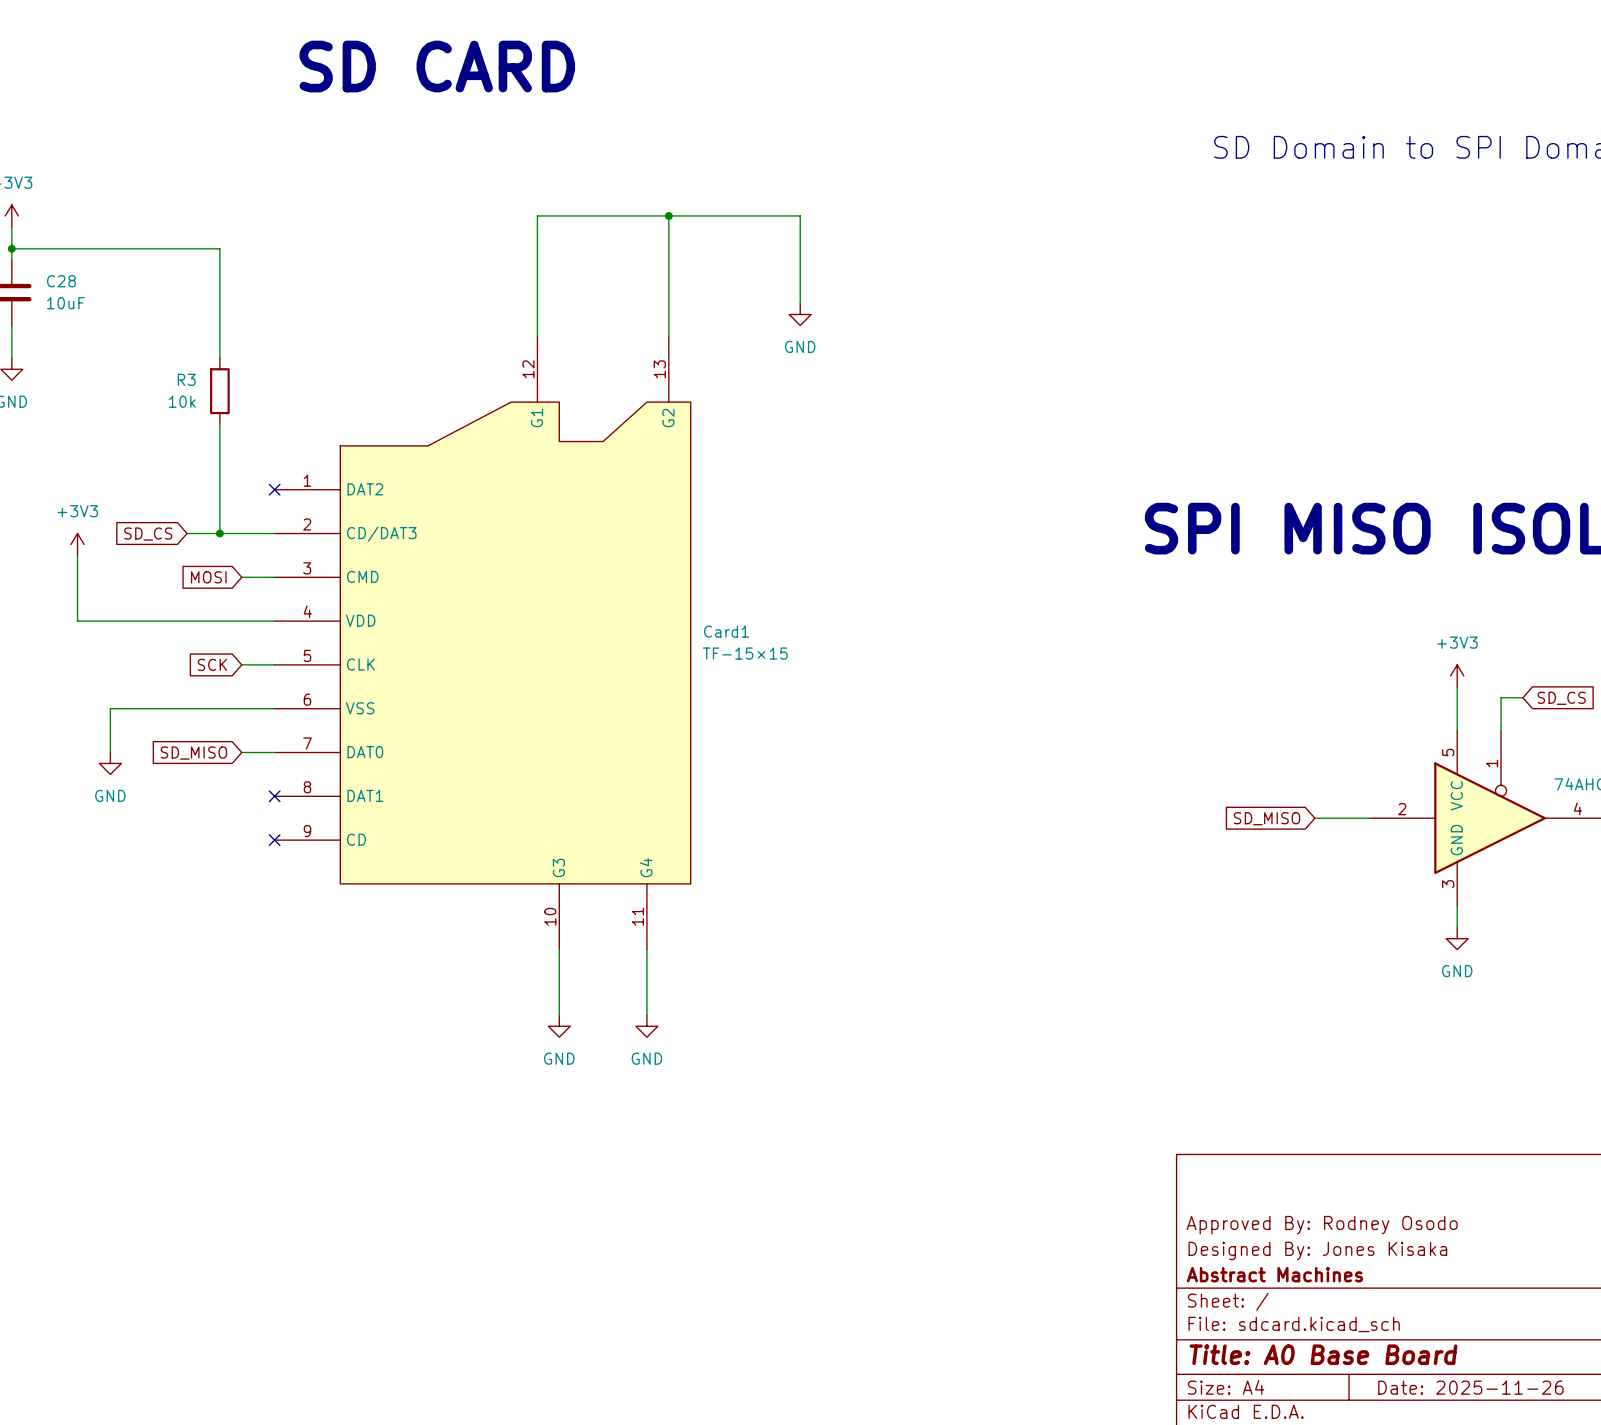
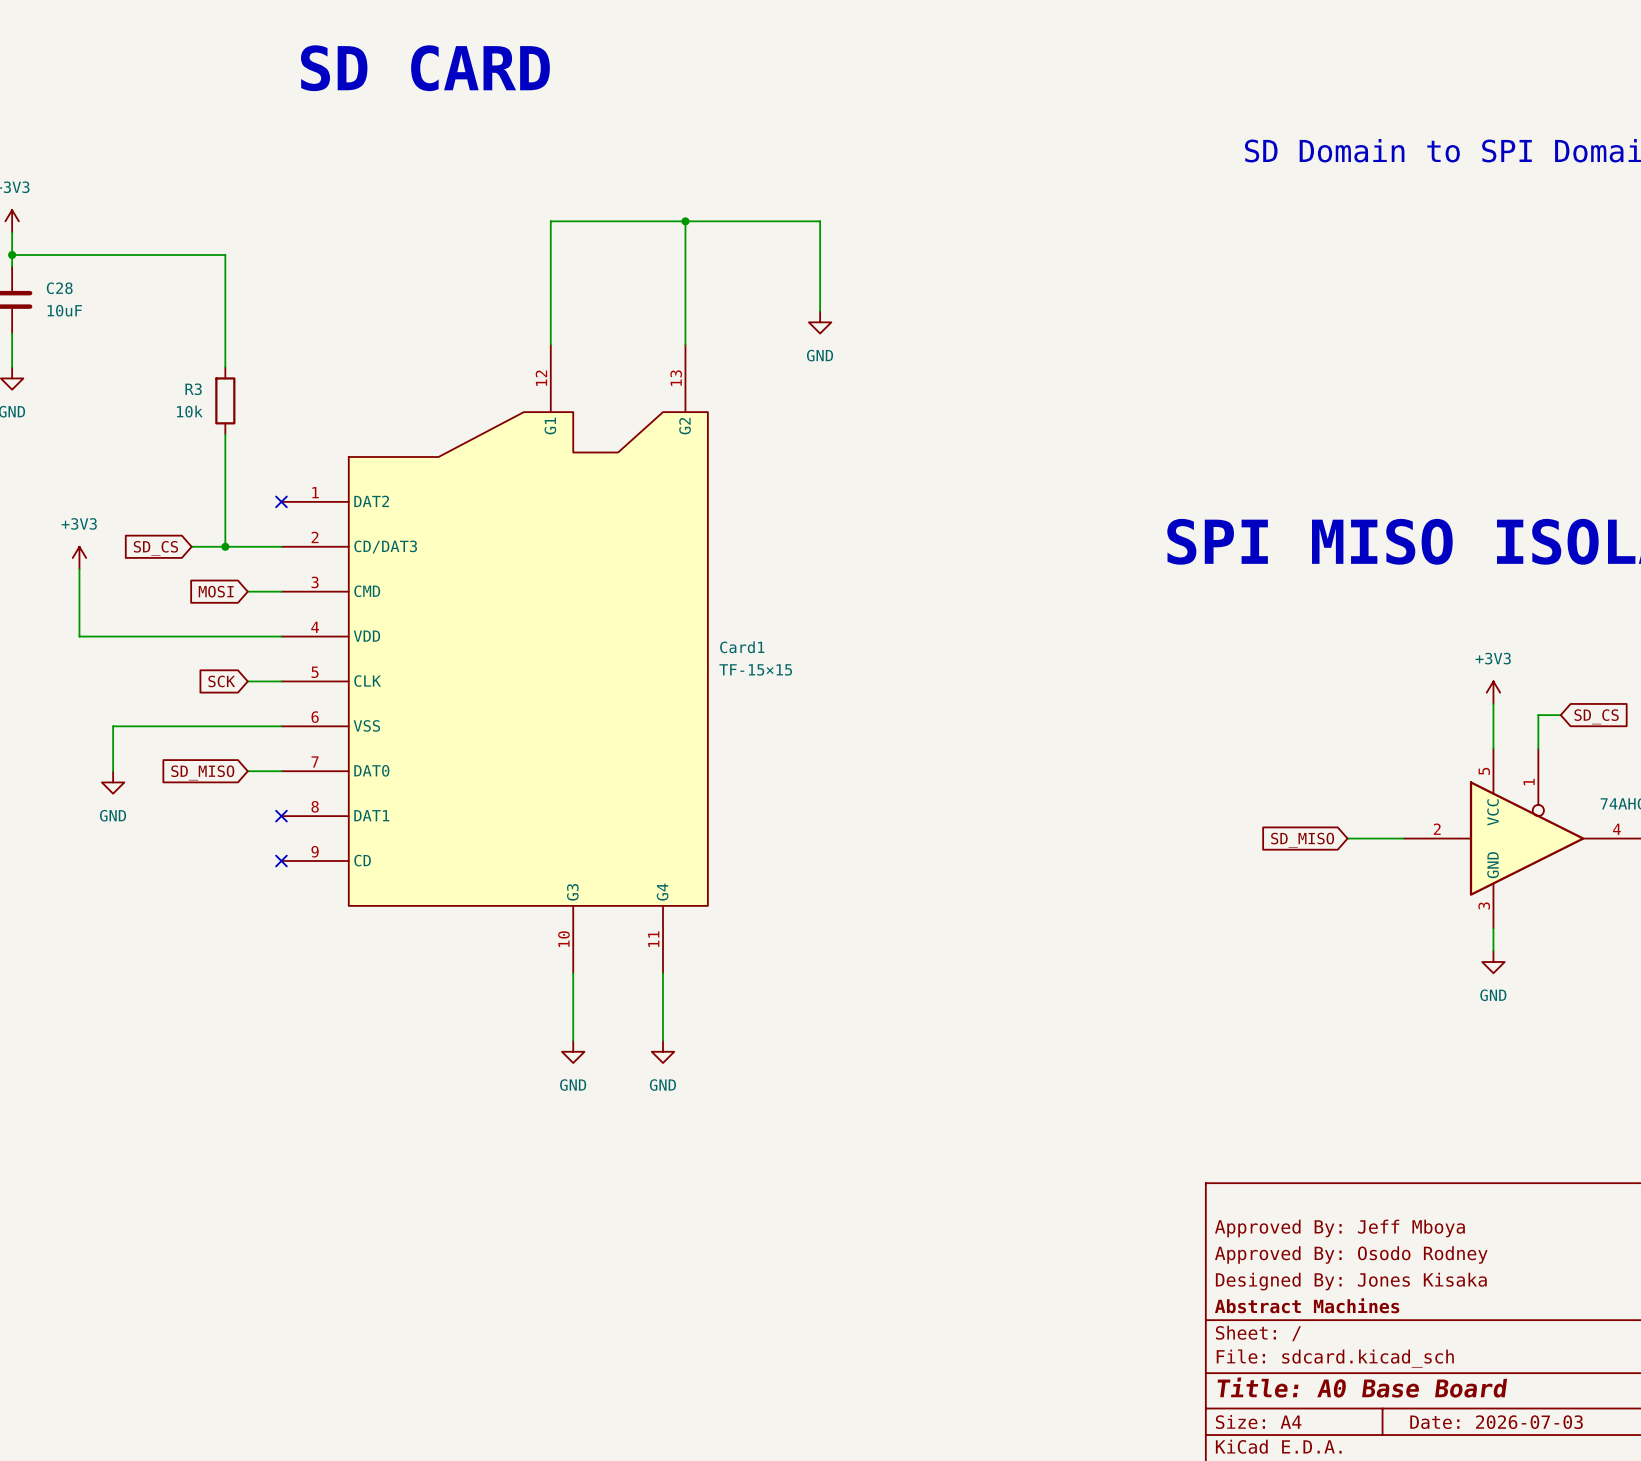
title block: none -> Approved By: Jeff Mboya (1339, 1228)
title block: Approved By: Rodney Osodo (1322, 1225) -> Approved By: Osodo Rodney (1351, 1254)
title block: Date: 2025-11-26 (1470, 1387) -> Date: 2026-07-03 (1496, 1422)

